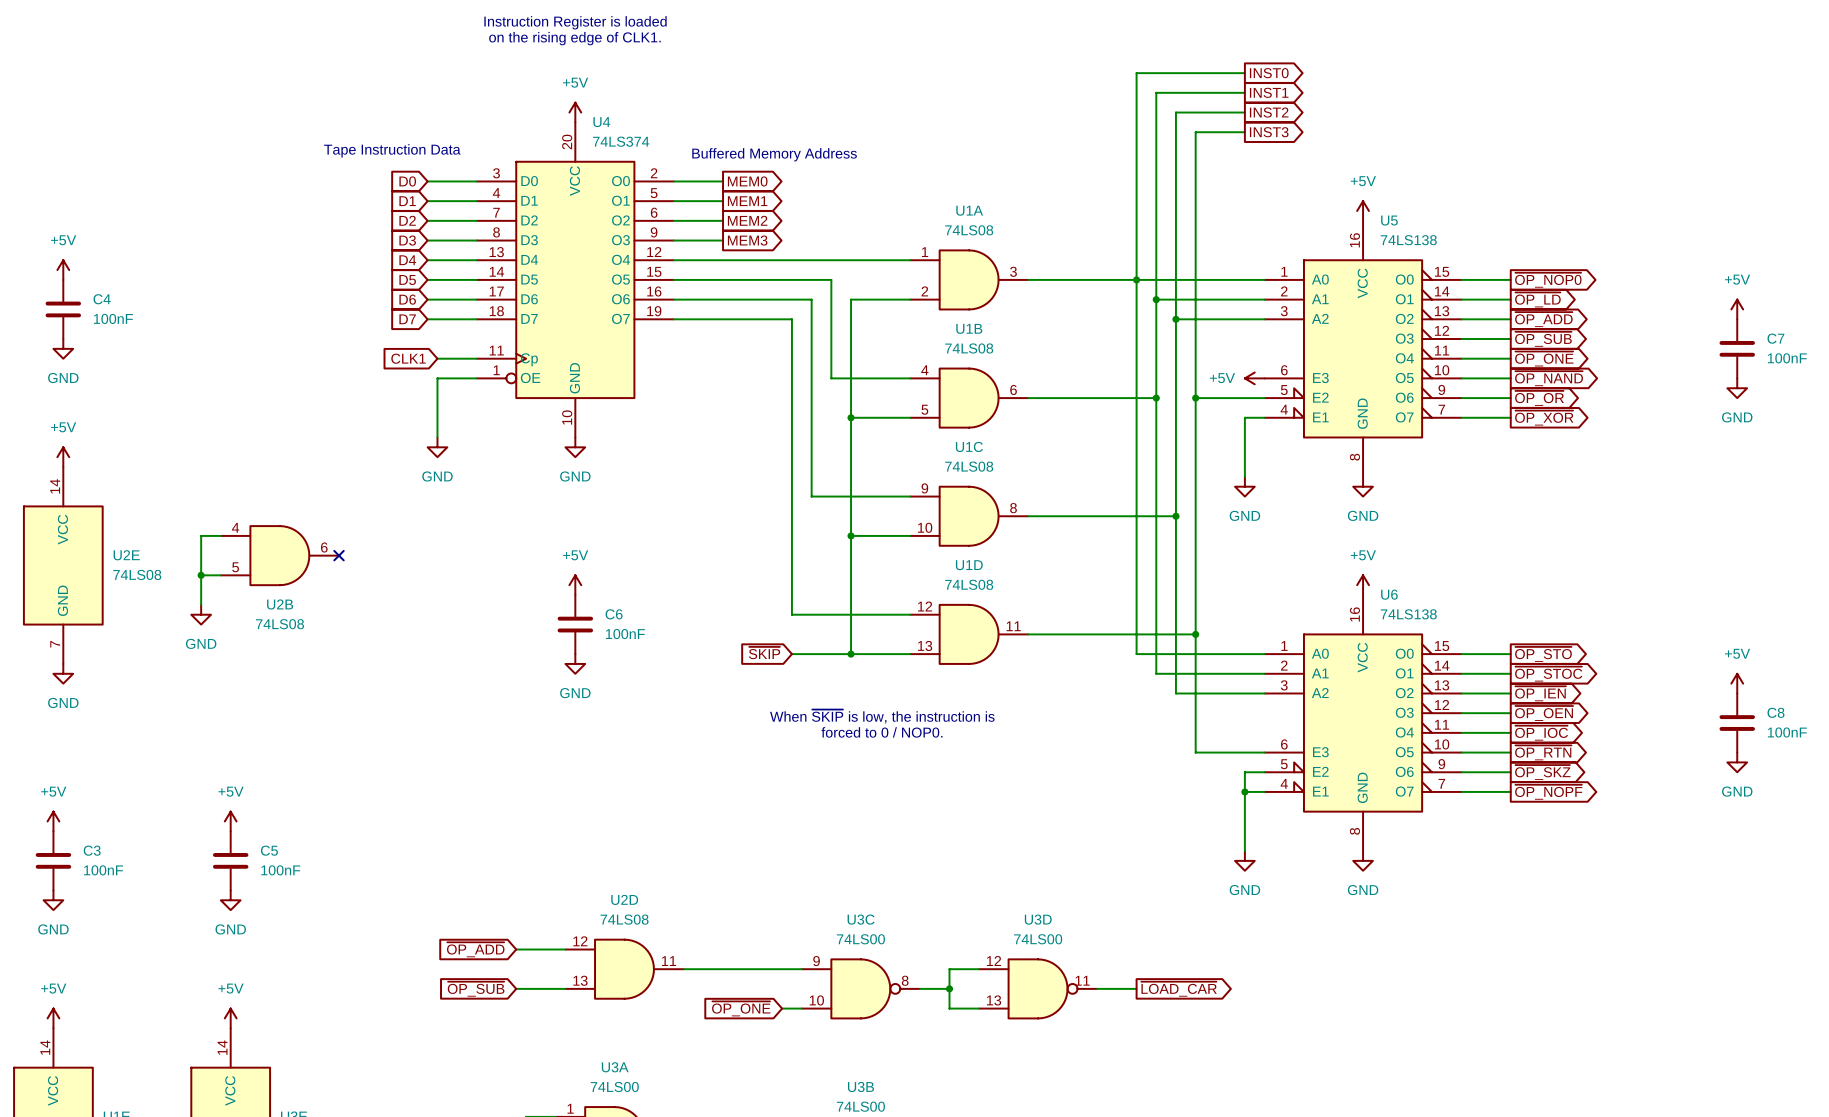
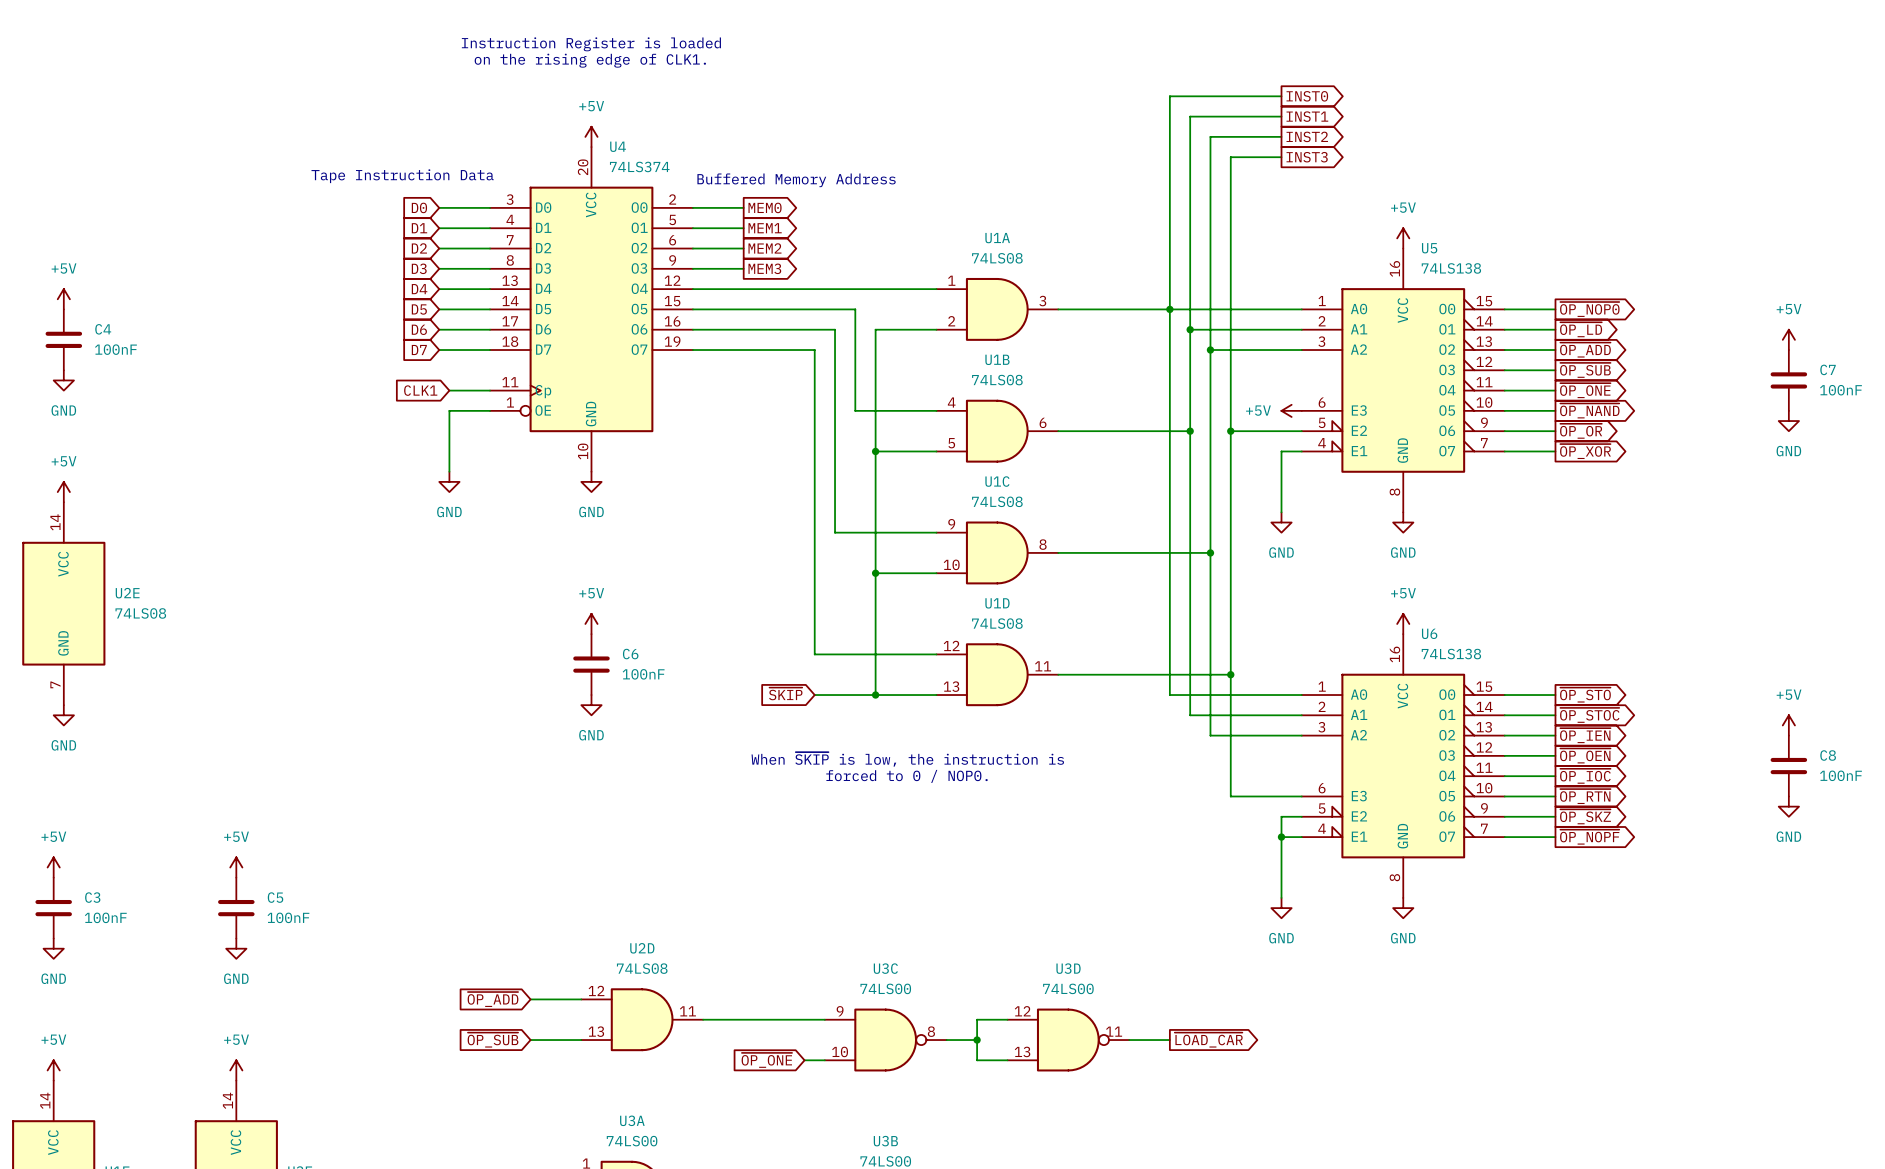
wire: (220, 535) (201, 535) (201, 604) -> none
U2B: 74LS08 (279, 555) -> none
no-connect mark: (339, 555) -> none
wire: (201, 575) (220, 575) -> none
junction: (201, 575) -> none
power symbol: GND (201, 614) -> none

